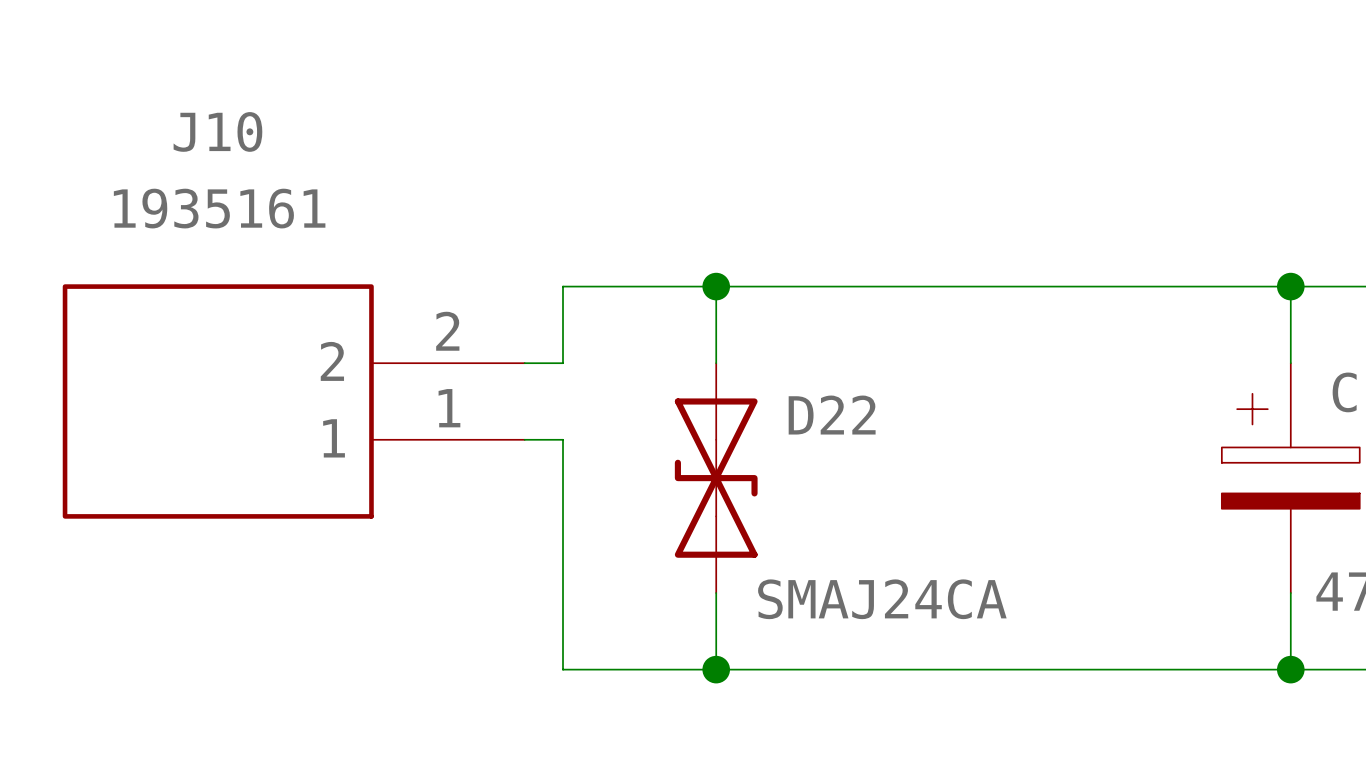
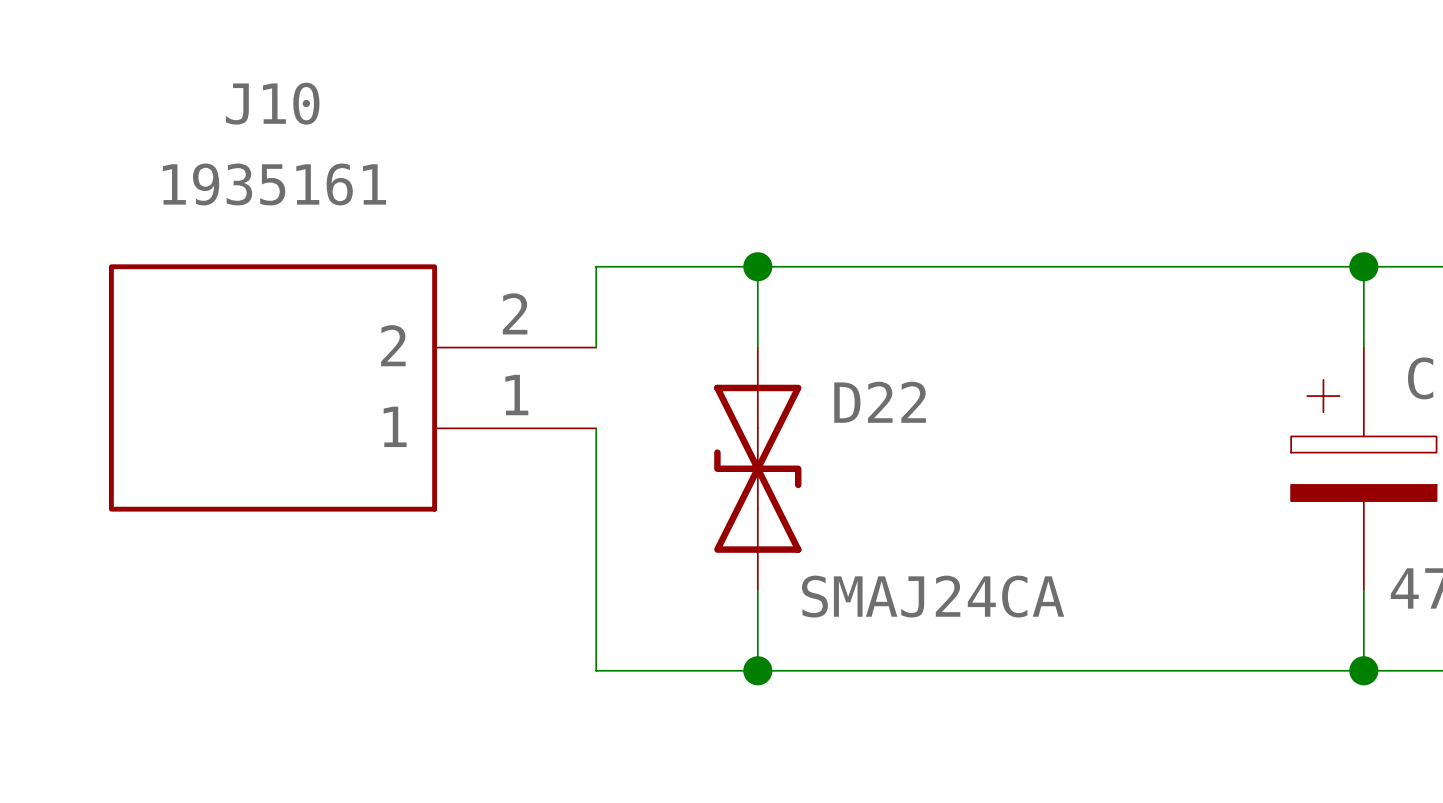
J10 position: (293, 401) -> (352, 387)

